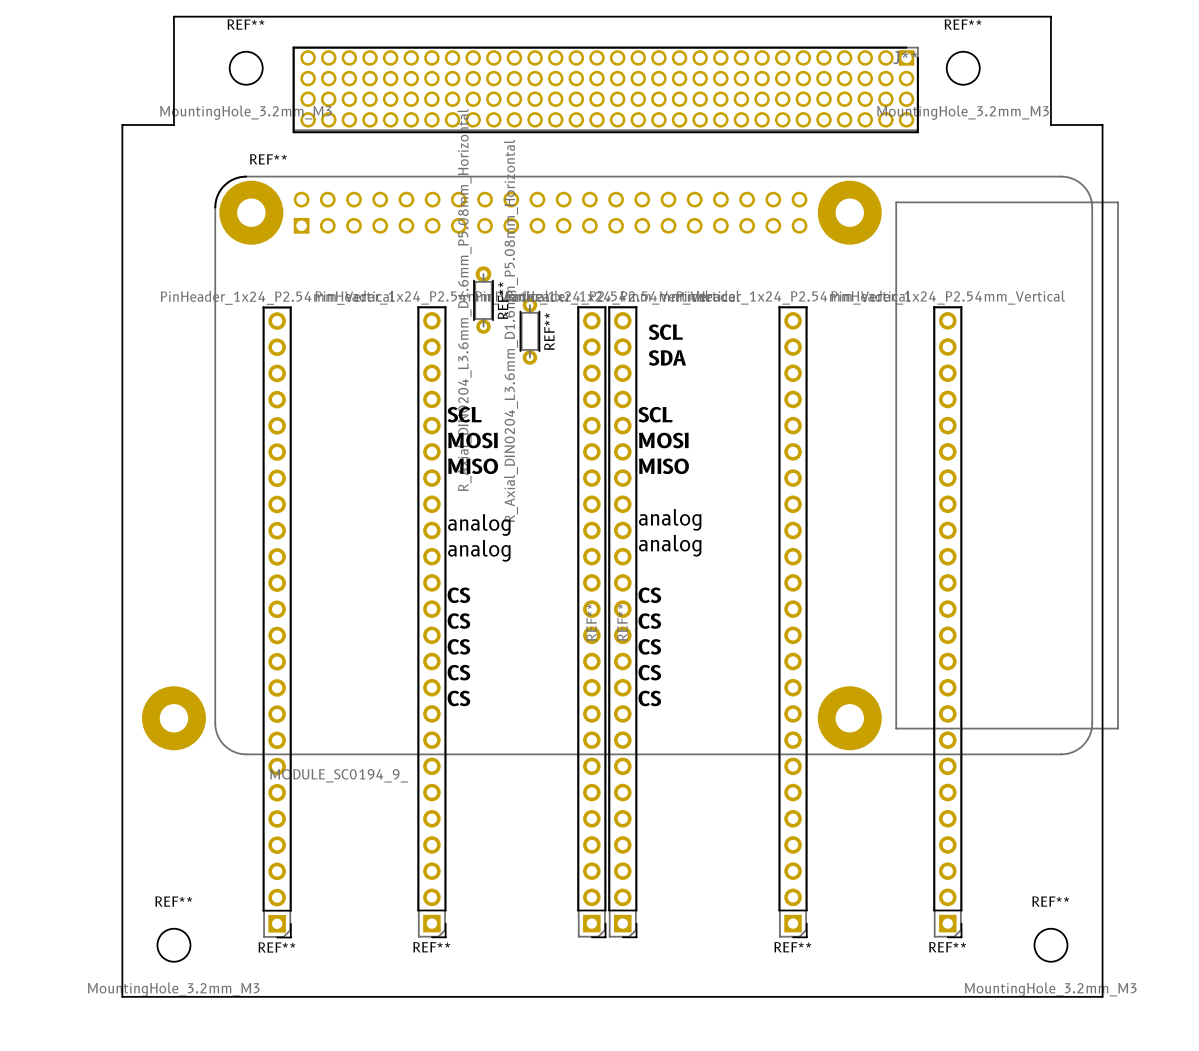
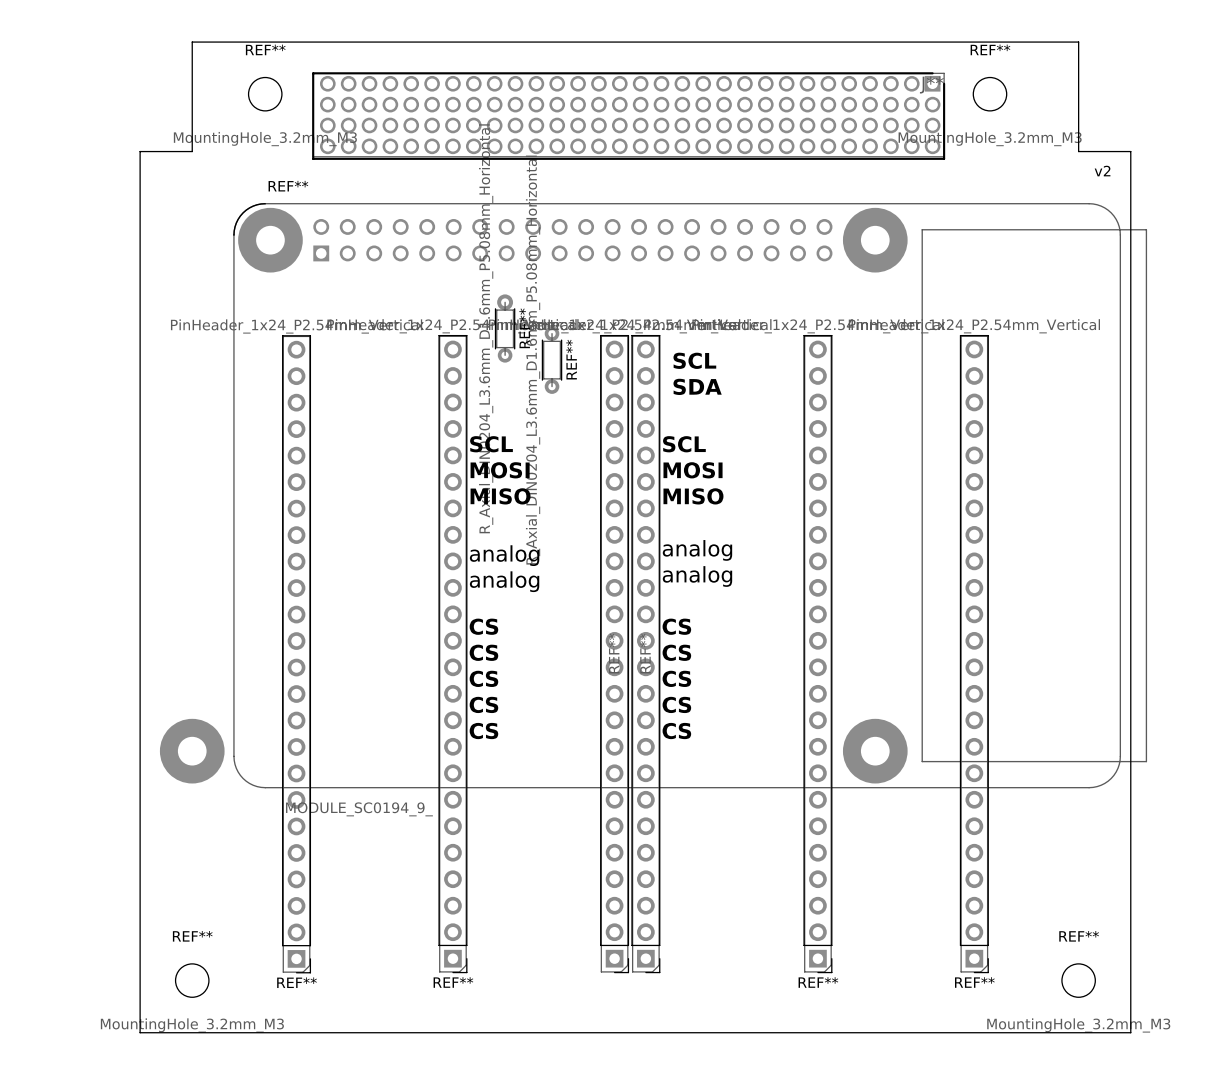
text: none -> v2 (1102, 171)

